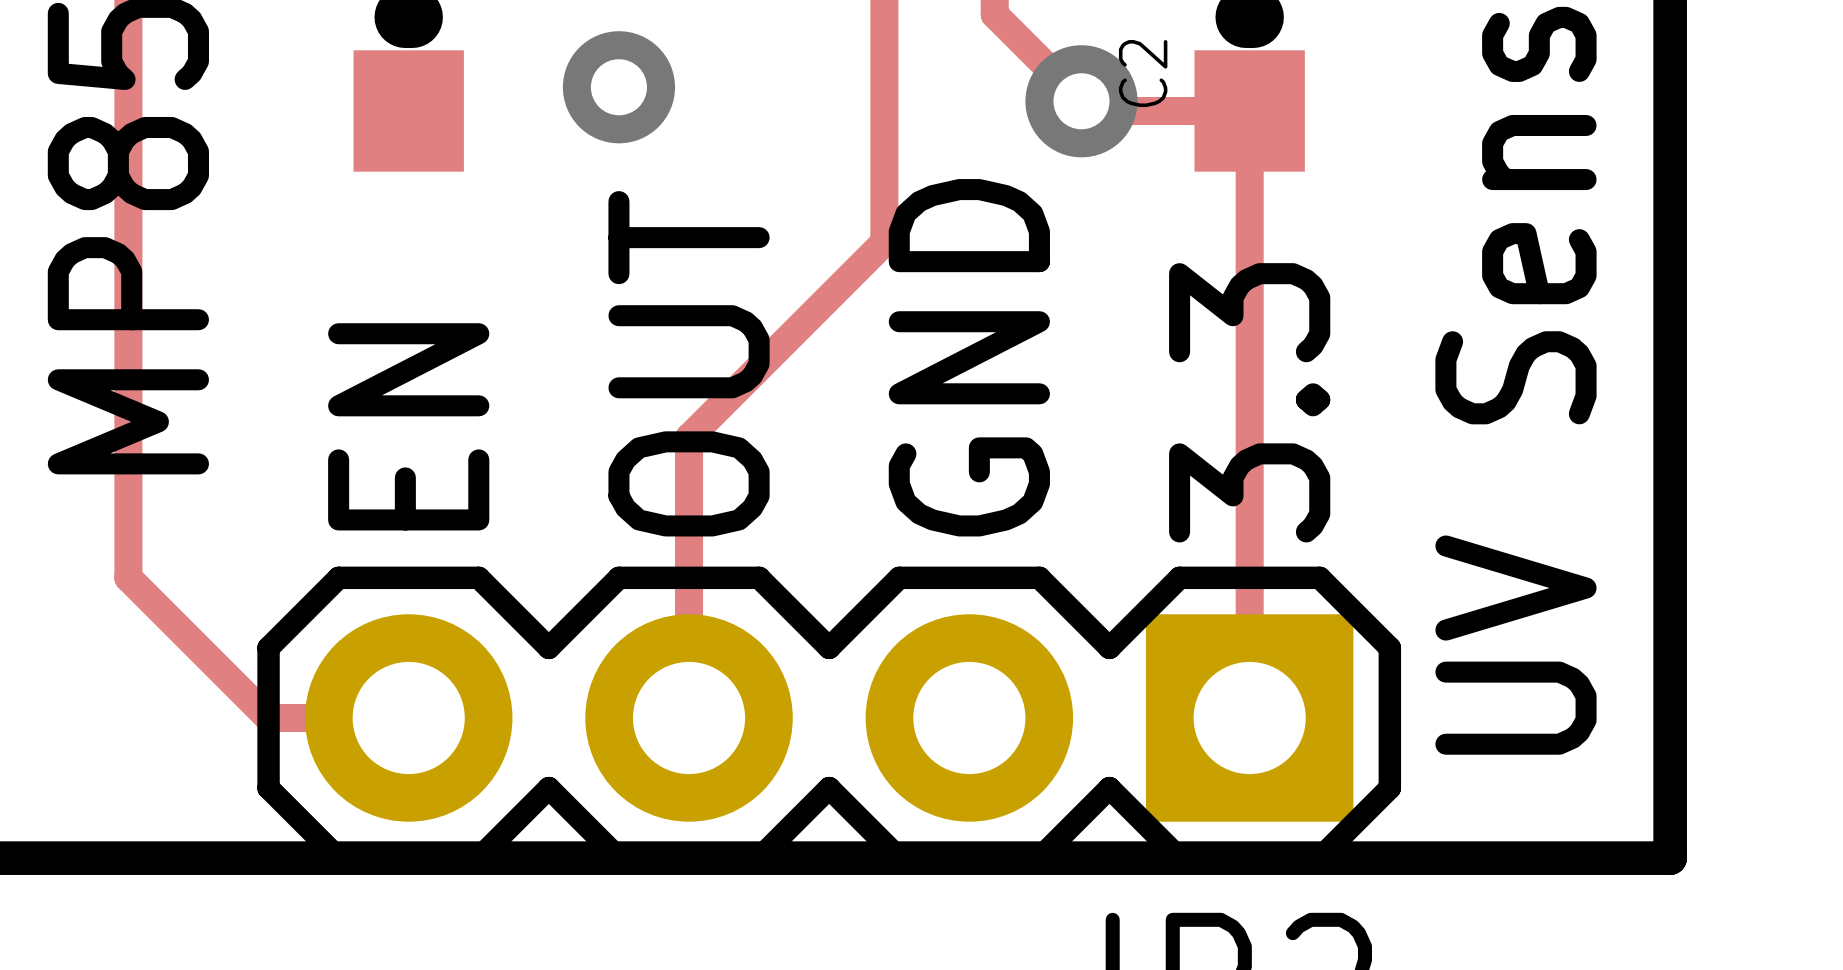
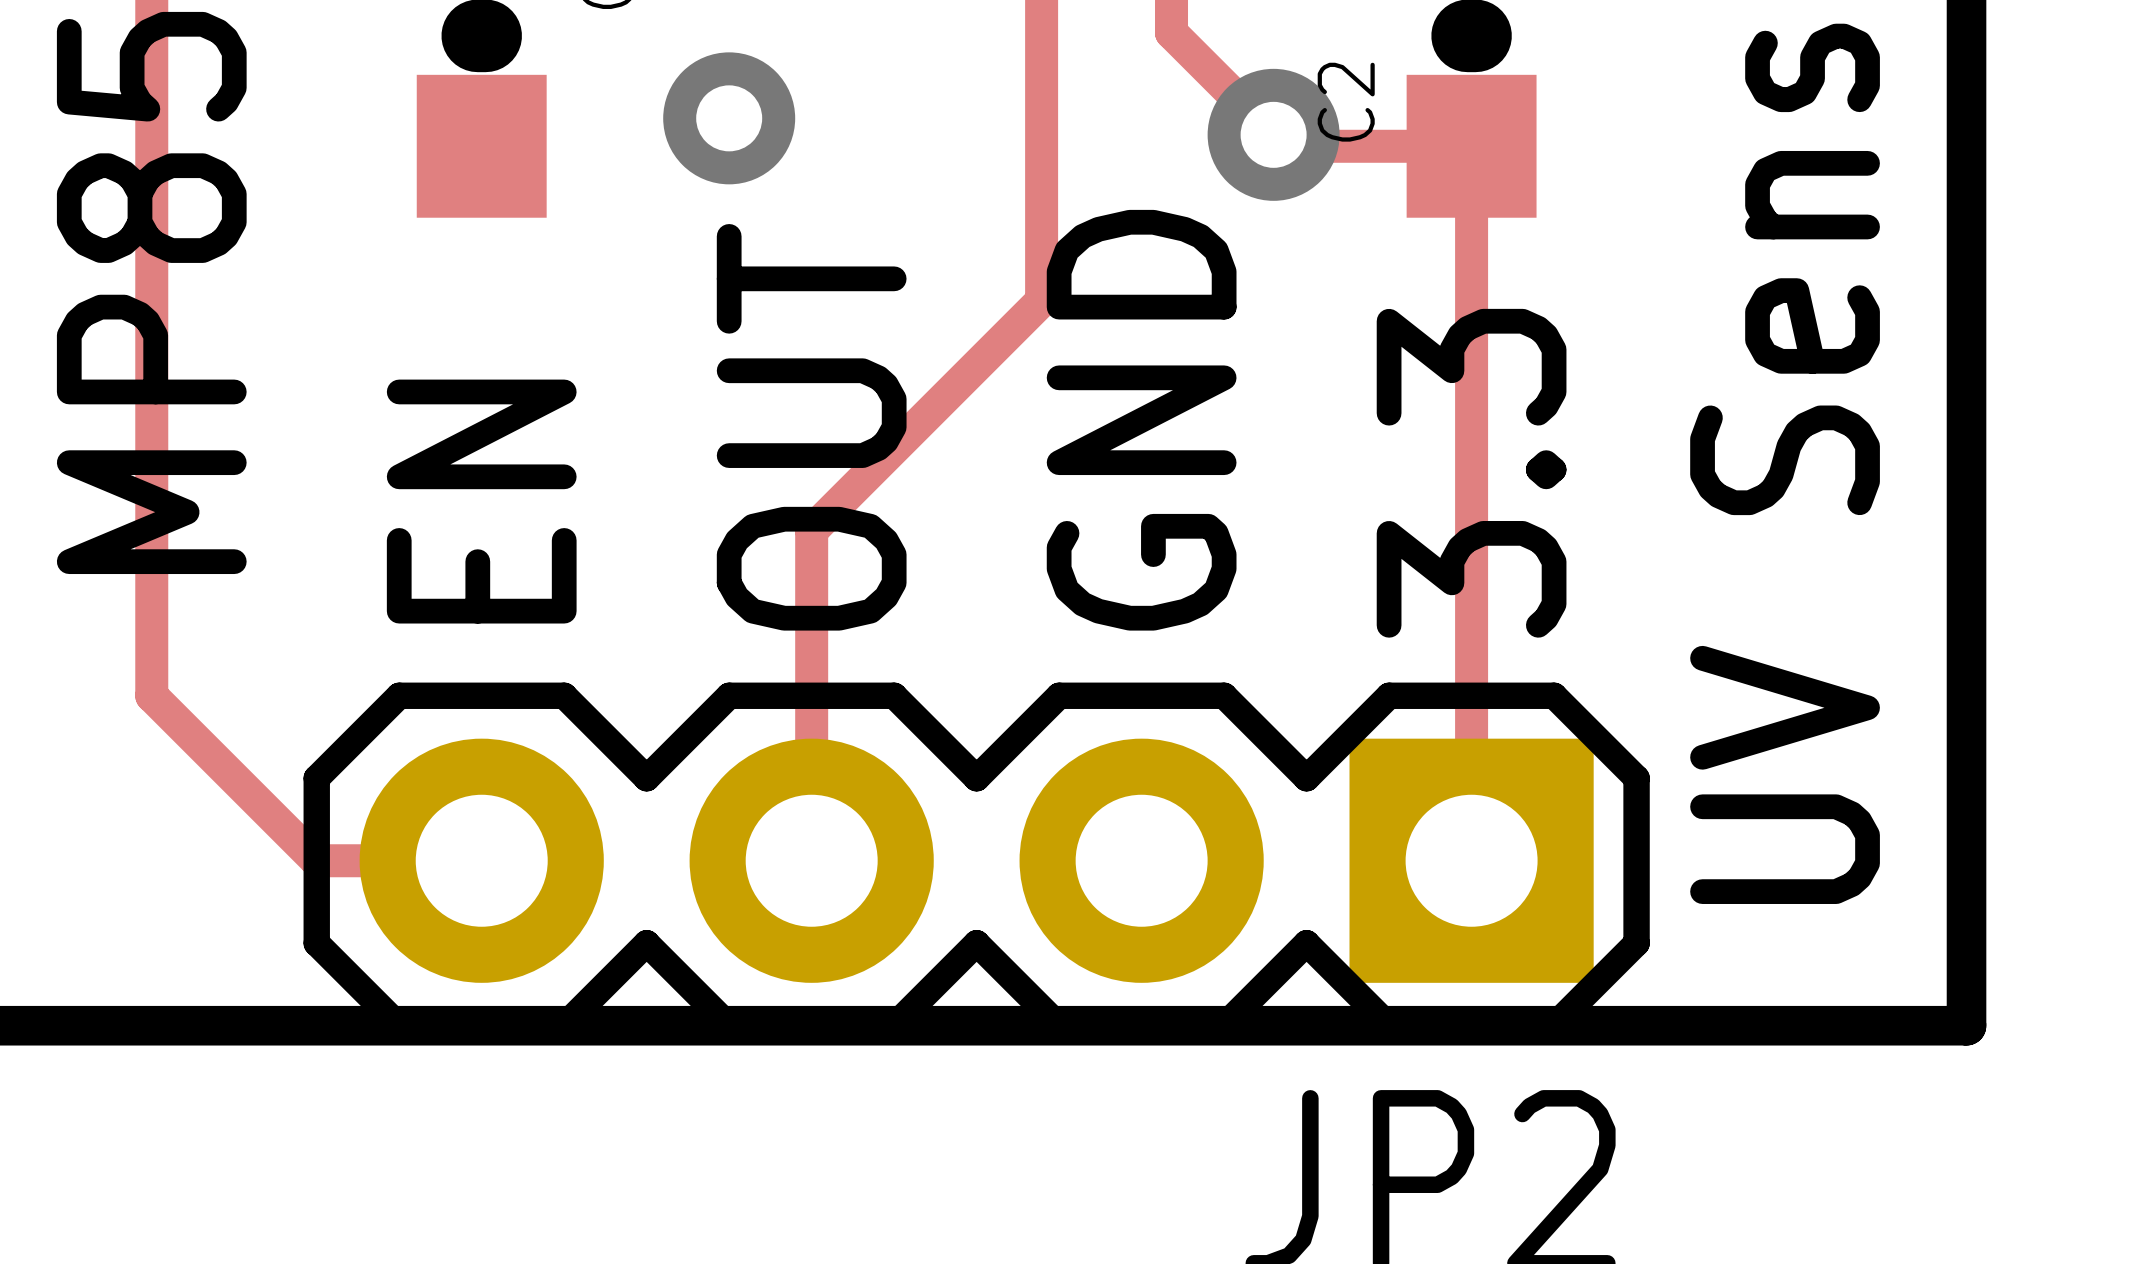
text position: GND (969, 357) -> GND (1141, 420)
text position: OUT (689, 363) -> OUT (811, 427)
text position: 3.3 (1249, 402) -> 3.3 (1471, 473)
text position: EN (408, 426) -> EN (481, 501)

